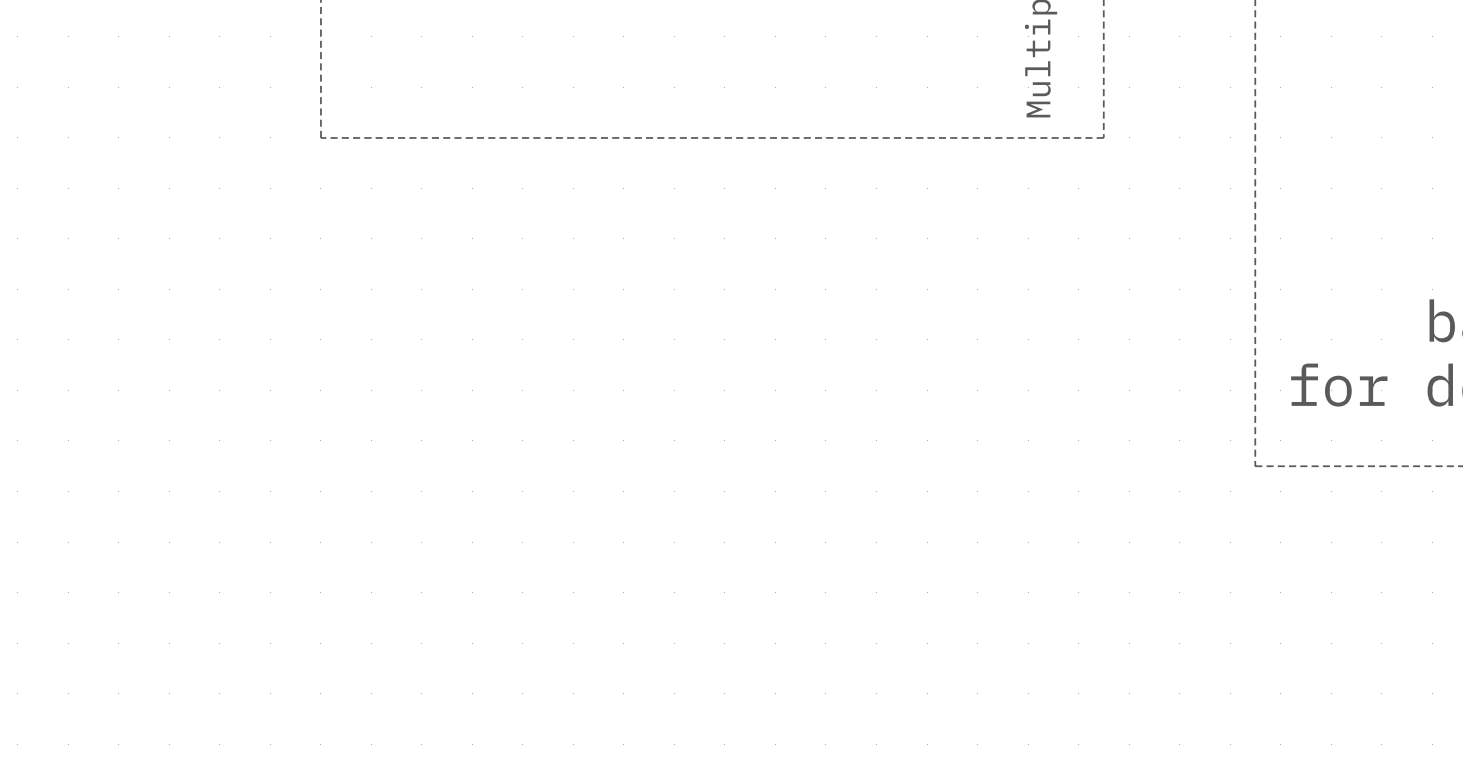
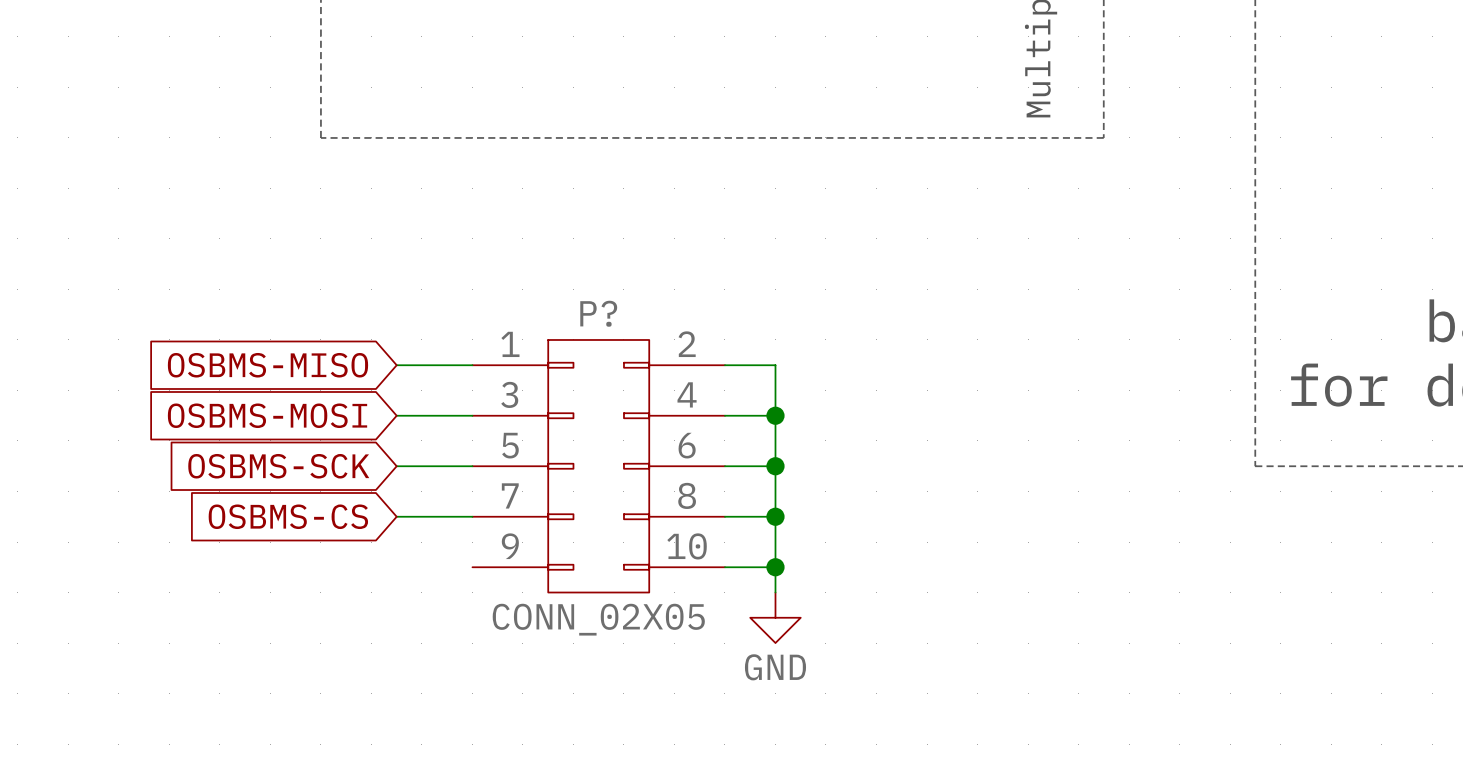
global label: none -> OSBMS-MISO (267, 365)
wire: none -> (396, 365) (472, 365)
wire: none -> (724, 365) (775, 365) (775, 592)
global label: none -> OSBMS-MOSI (267, 415)
wire: none -> (396, 415) (472, 415)
wire: none -> (724, 415) (775, 415)
junction: none -> (775, 415)
global label: none -> OSBMS-SCK (278, 466)
wire: none -> (396, 466) (472, 466)
P?: none -> CONN_02X05 (598, 466)
wire: none -> (724, 466) (775, 466)
junction: none -> (775, 466)
global label: none -> OSBMS-CS (288, 516)
wire: none -> (396, 516) (472, 516)
wire: none -> (724, 516) (775, 516)
junction: none -> (775, 516)
wire: none -> (724, 567) (775, 567)
junction: none -> (775, 567)
power symbol: none -> GND (775, 617)

